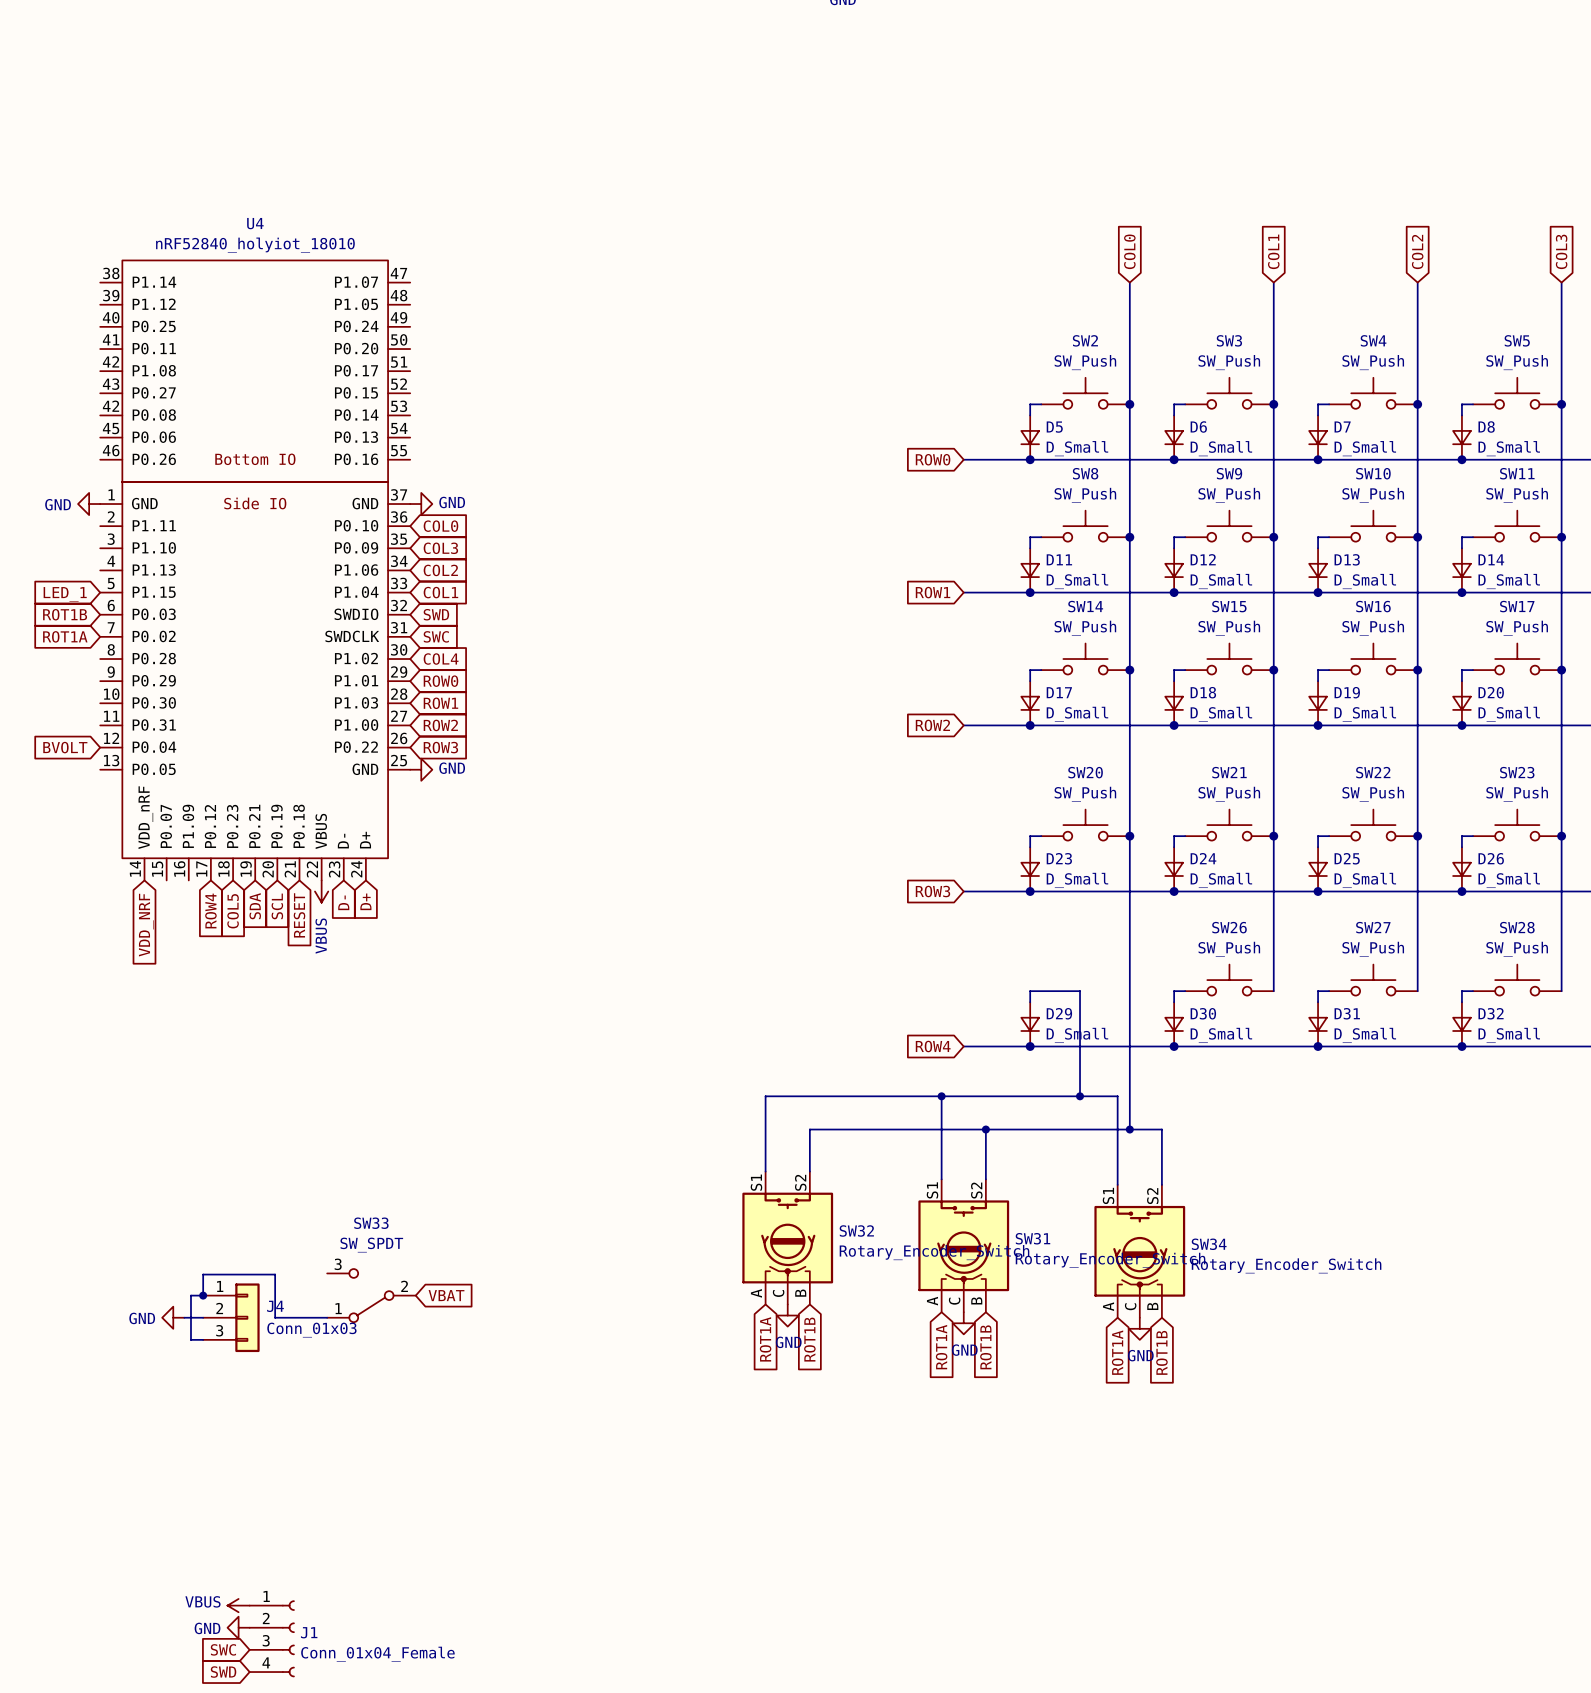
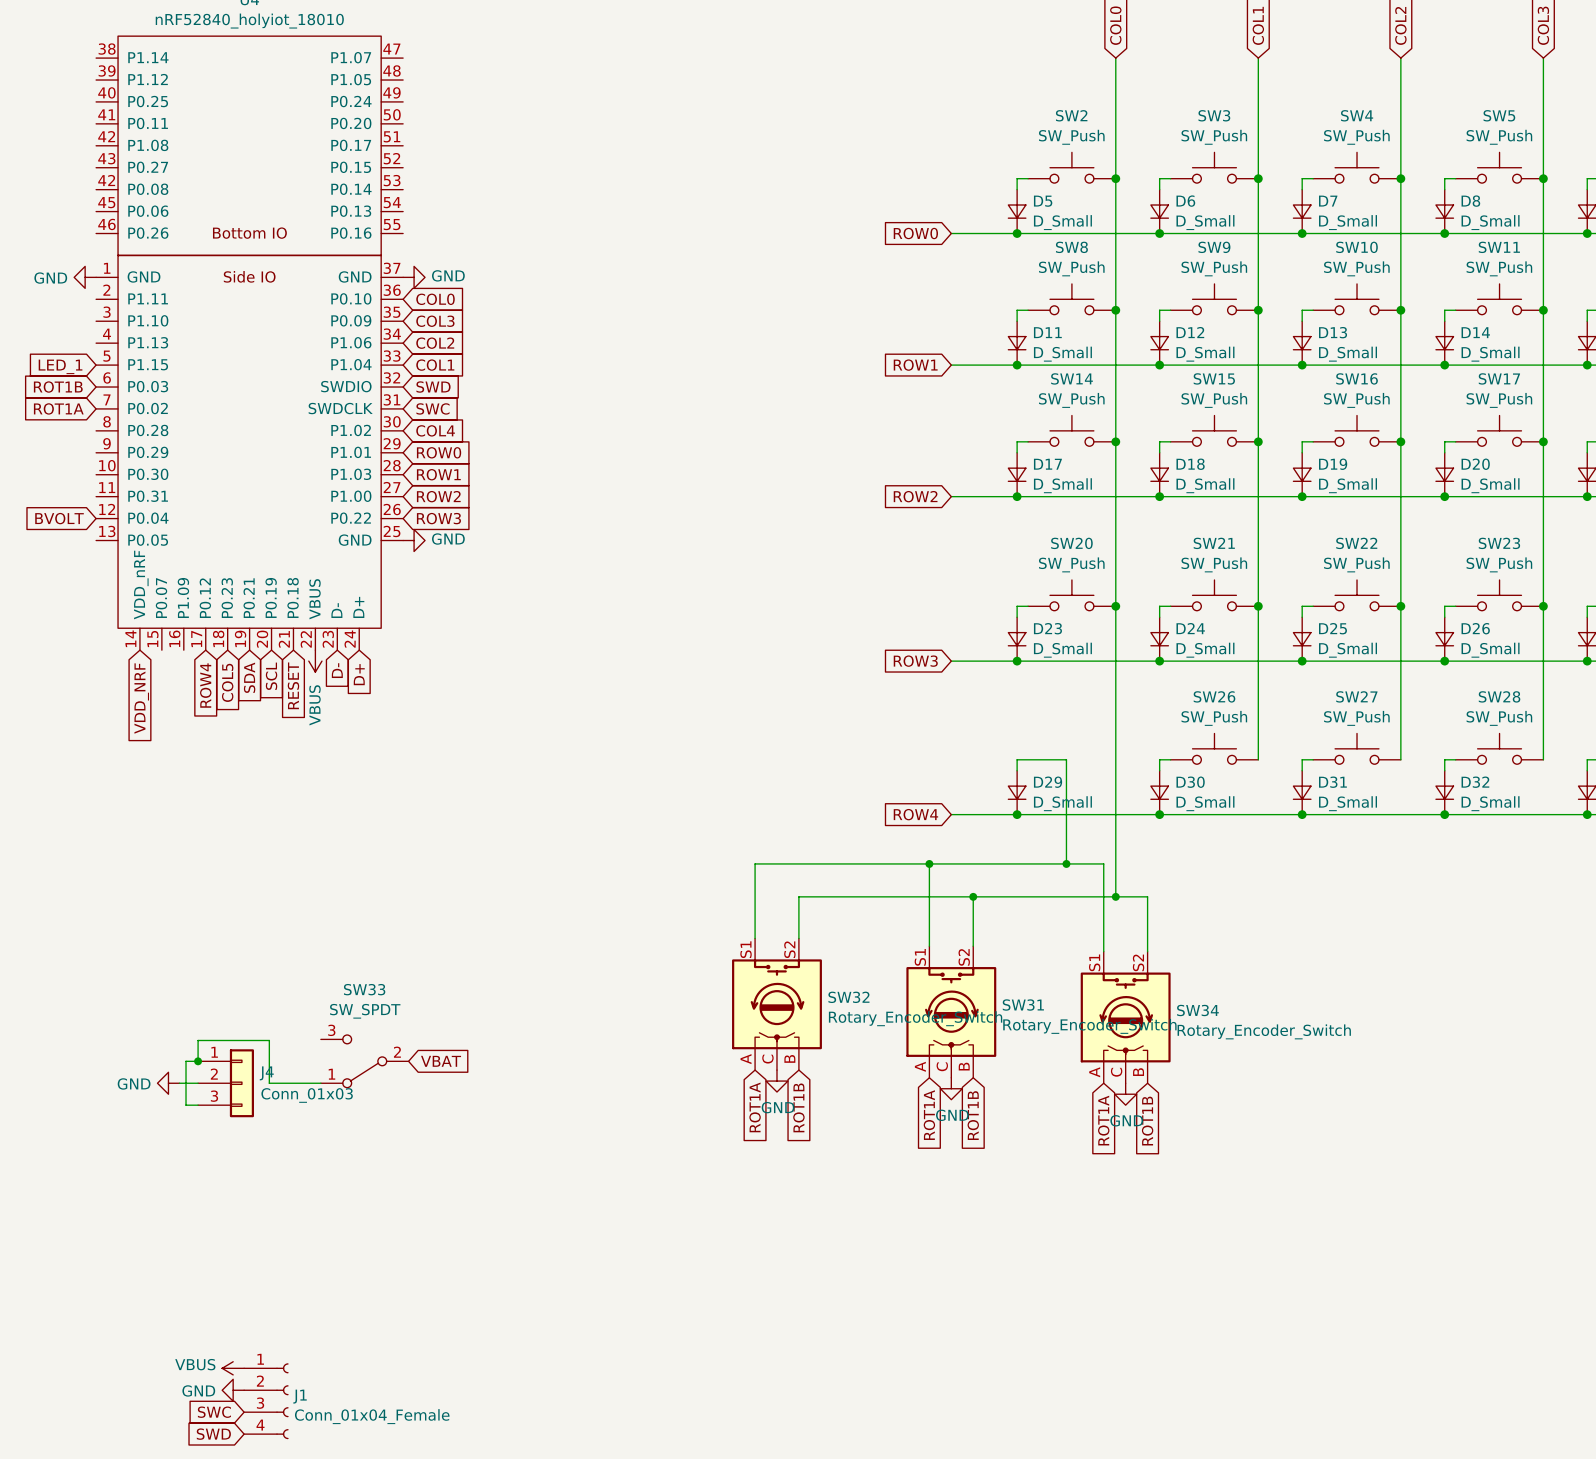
SW32 symbol: [742, 1171, 834, 1305] -> [732, 938, 822, 1071]
SW31 symbol: [918, 1179, 1010, 1313] -> [906, 946, 997, 1078]
SW34 symbol: [1094, 1184, 1186, 1318] -> [1080, 951, 1171, 1084]

